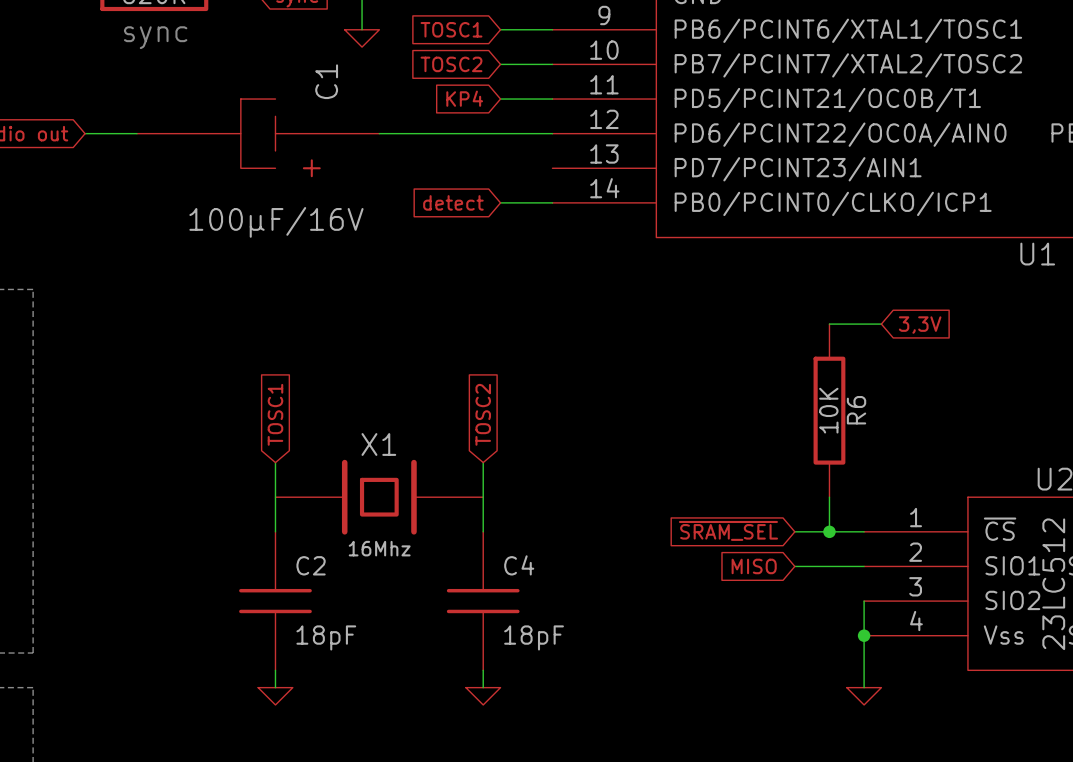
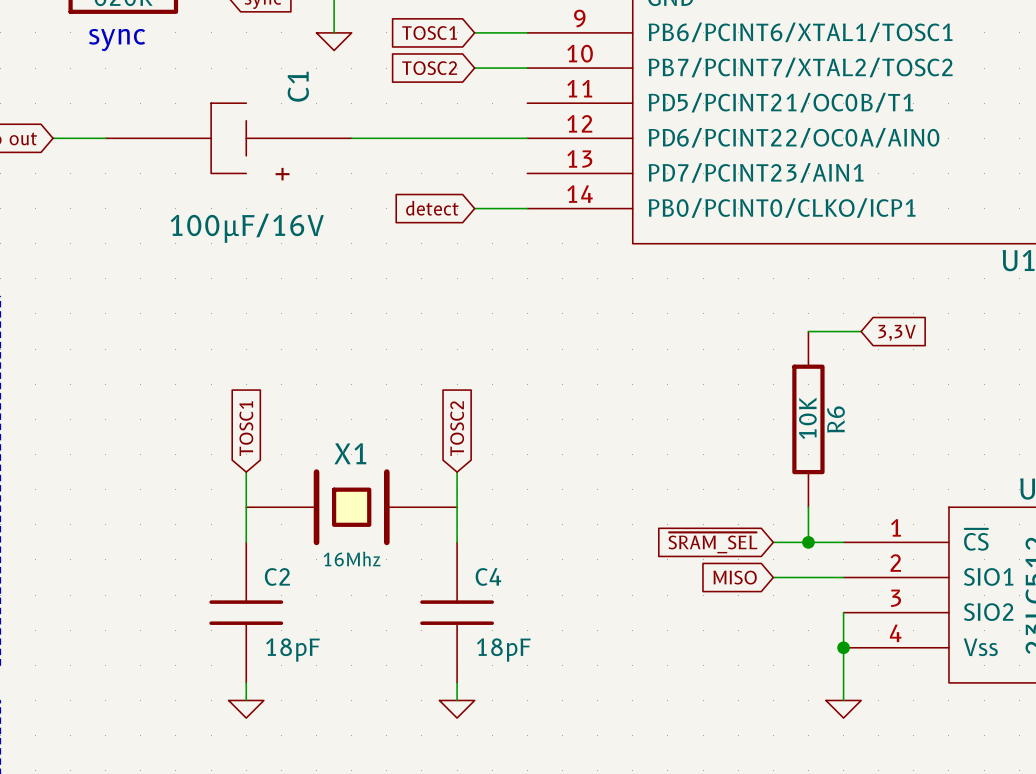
global label: KP4 (464, 98) -> none
wire: (500, 99) (552, 99) -> none

